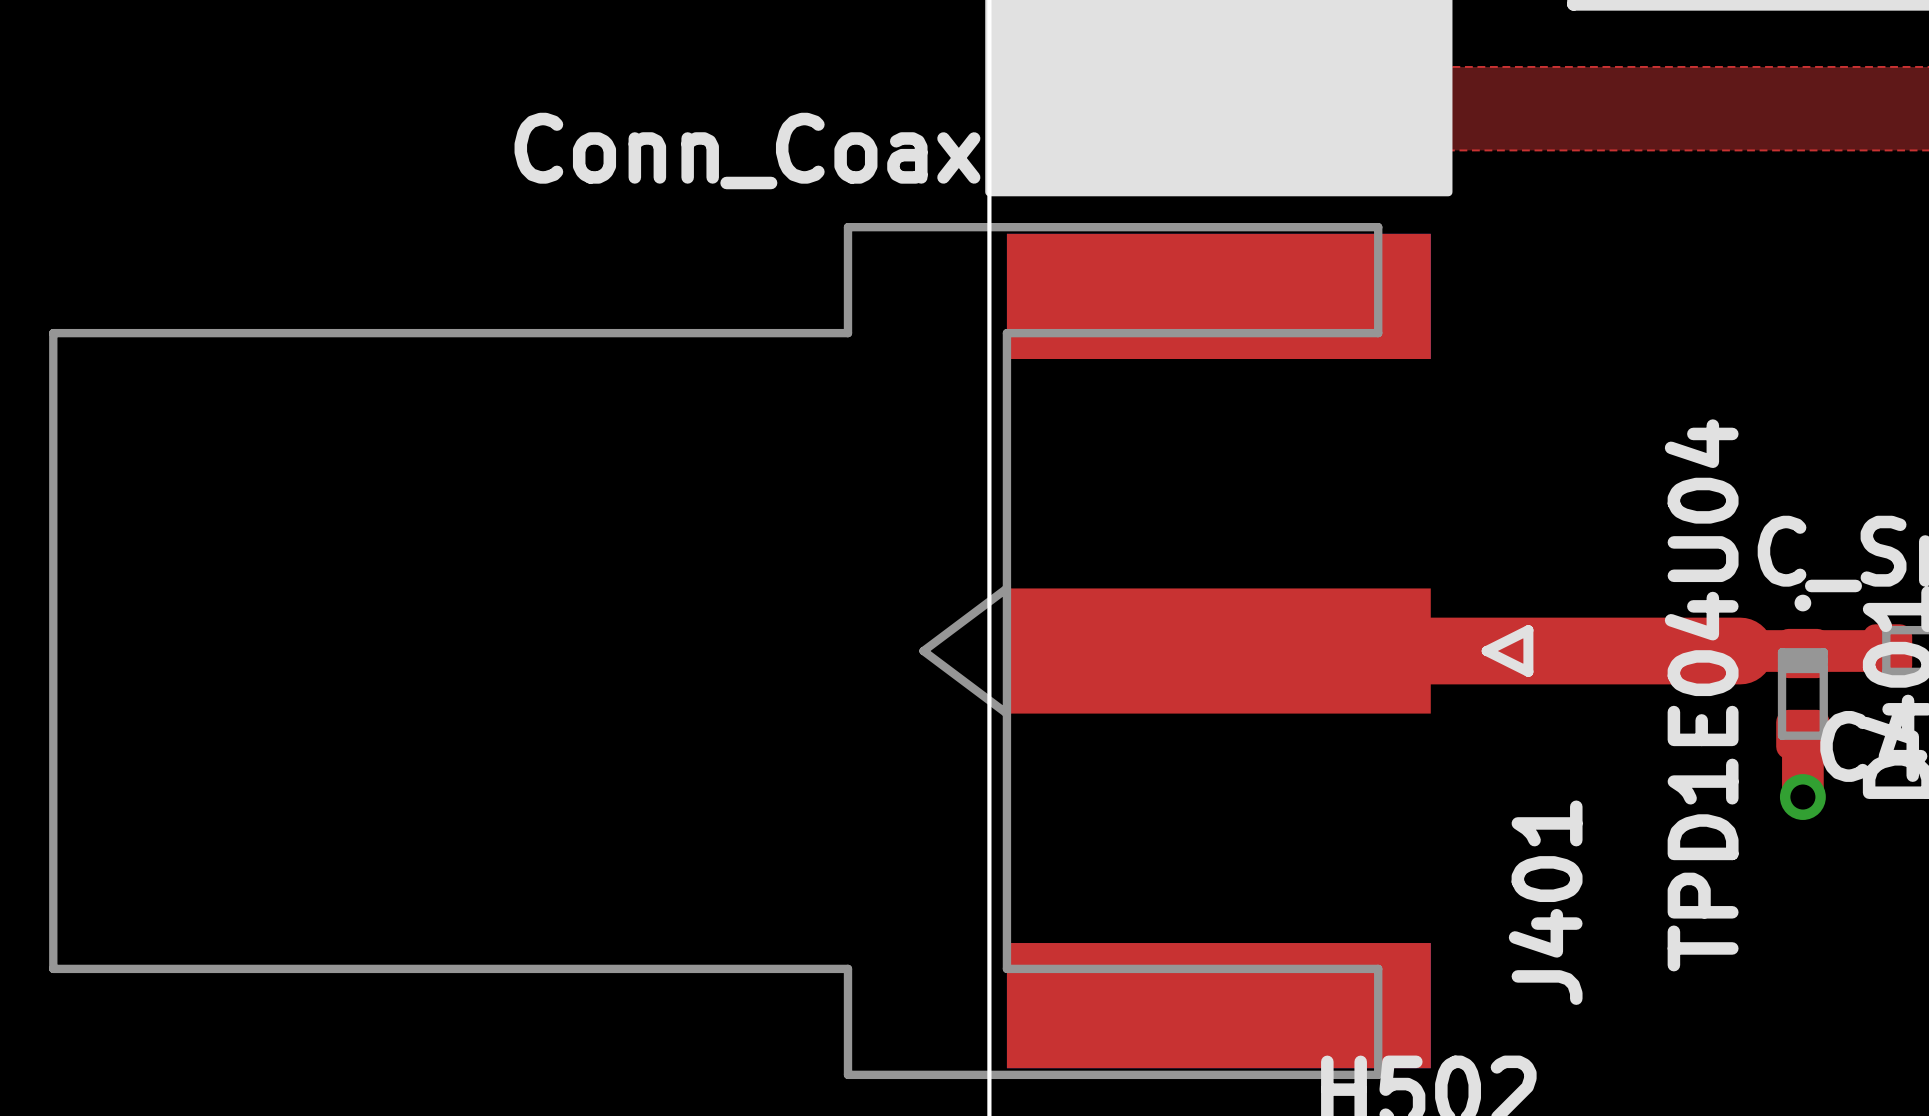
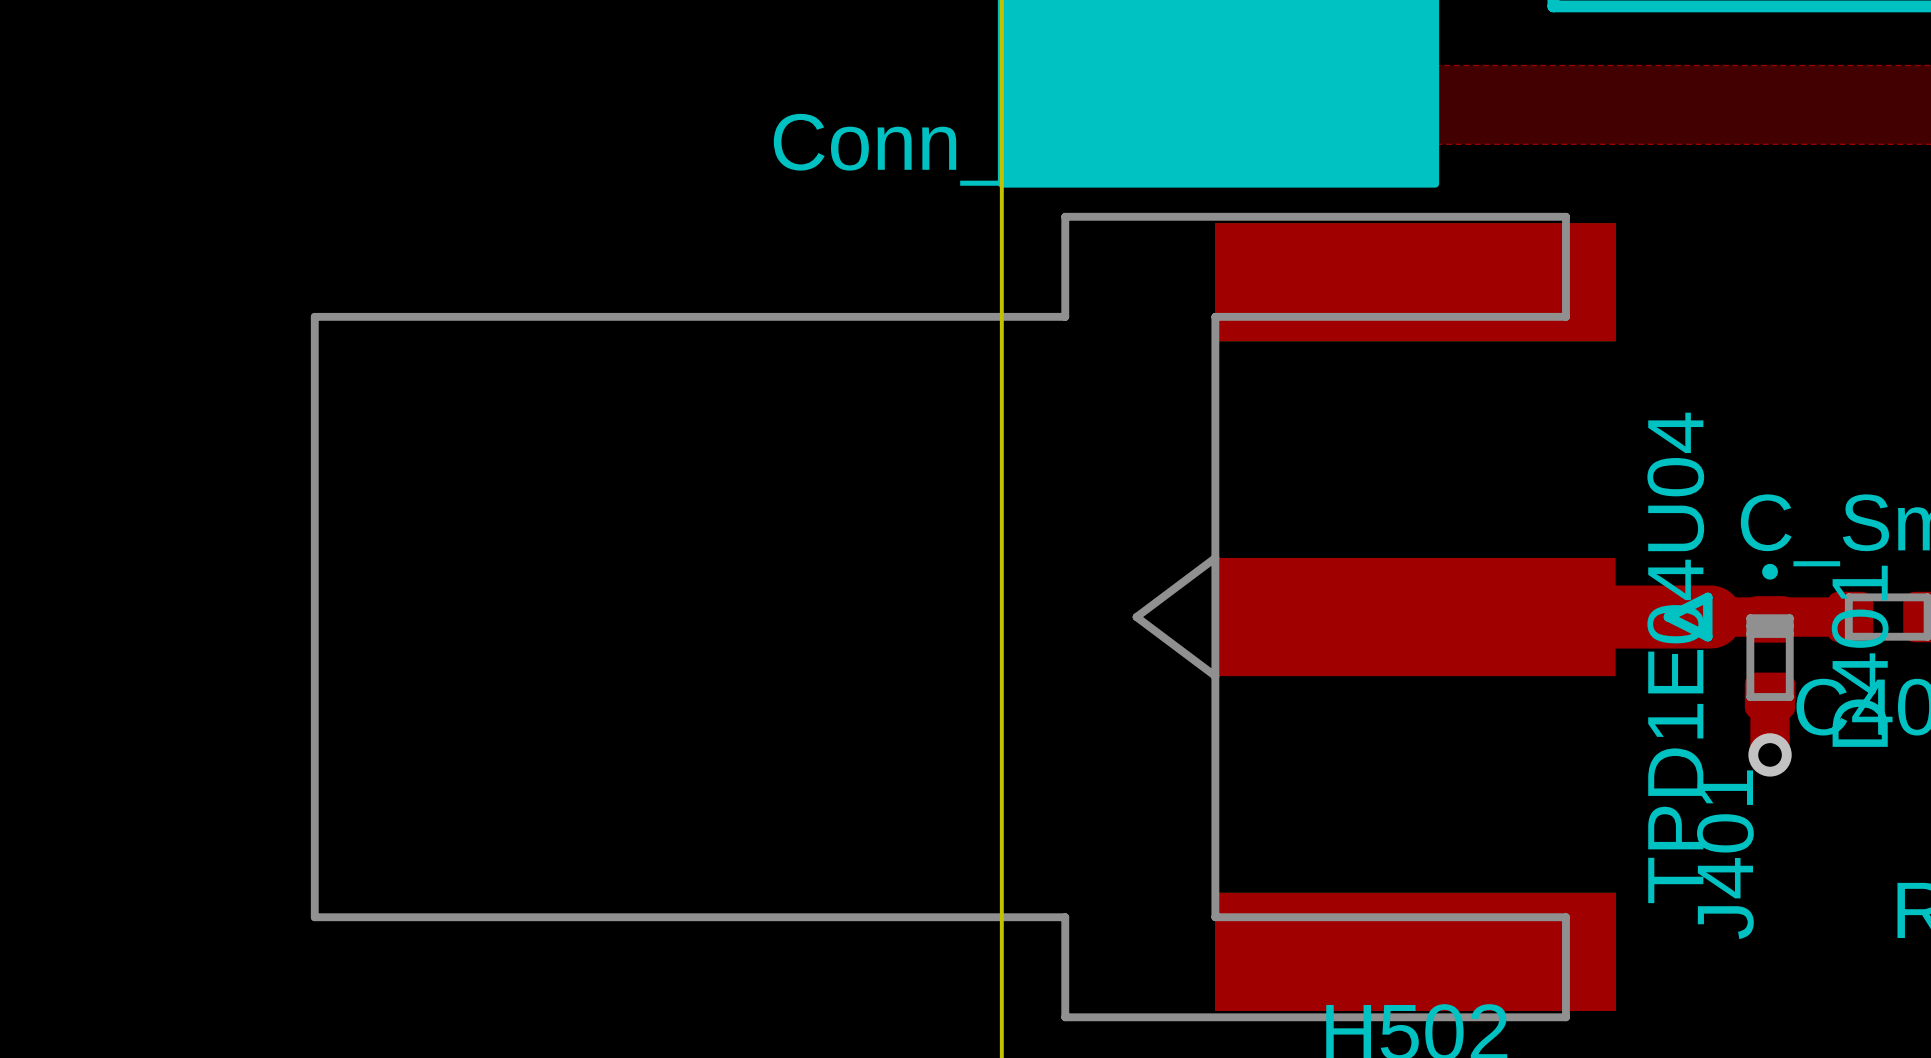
J401 position: (791, 651) -> (1011, 617)

